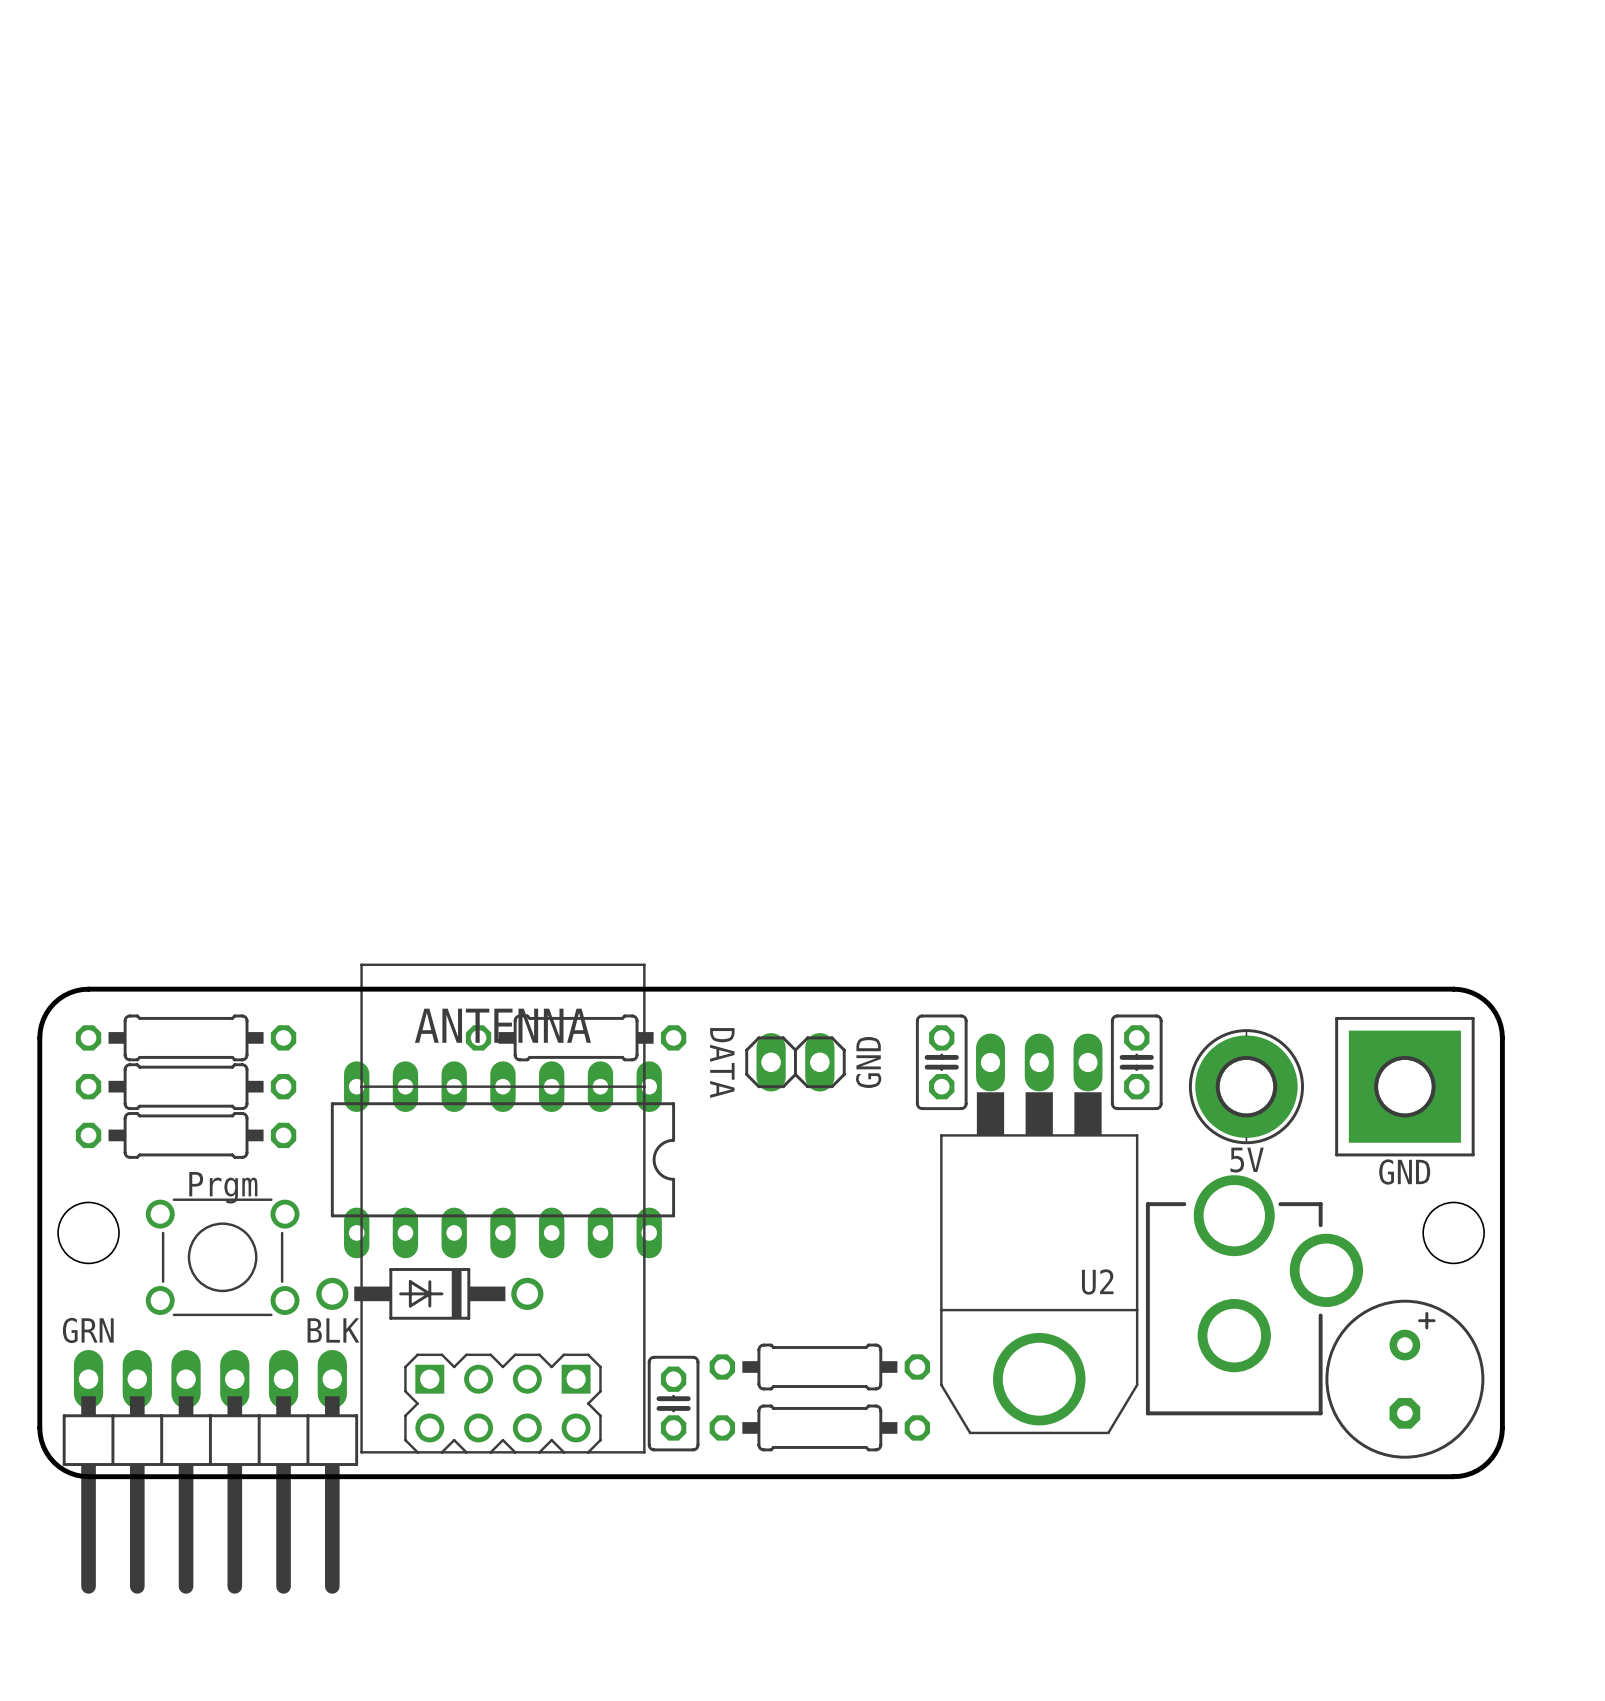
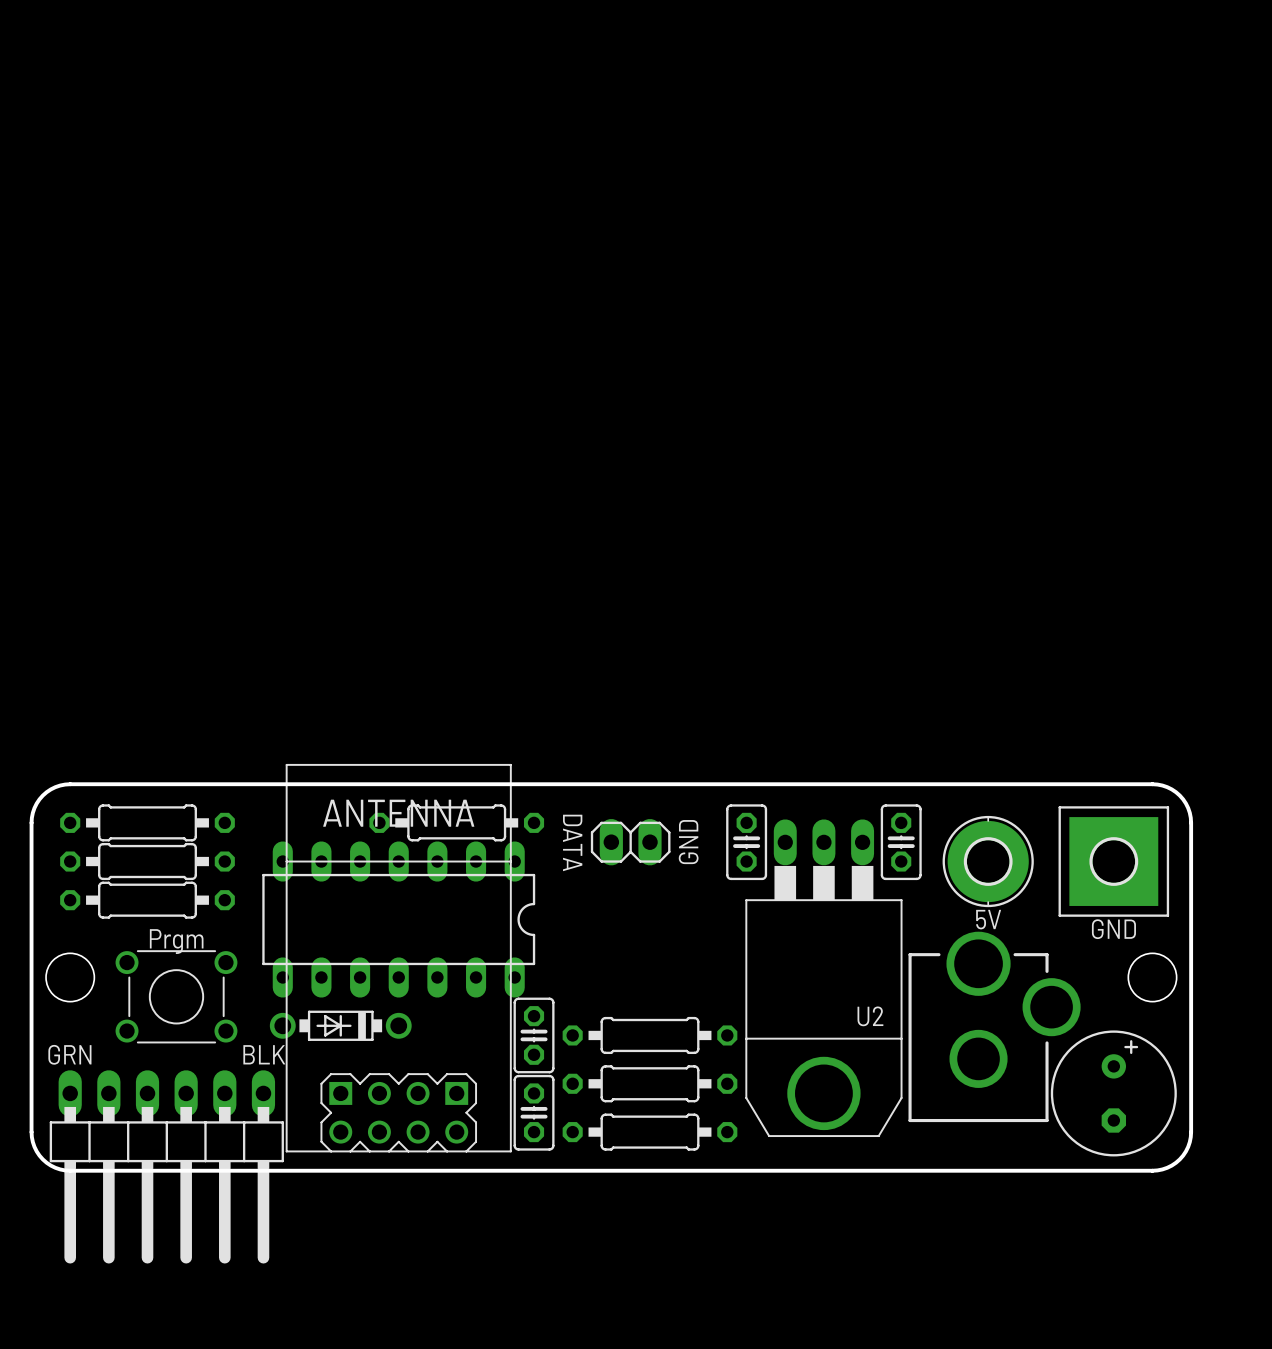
part footprint: [316, 1268, 544, 1320] -> [269, 1010, 412, 1041]
part: none -> (534, 1035)
part: none -> (649, 1035)

